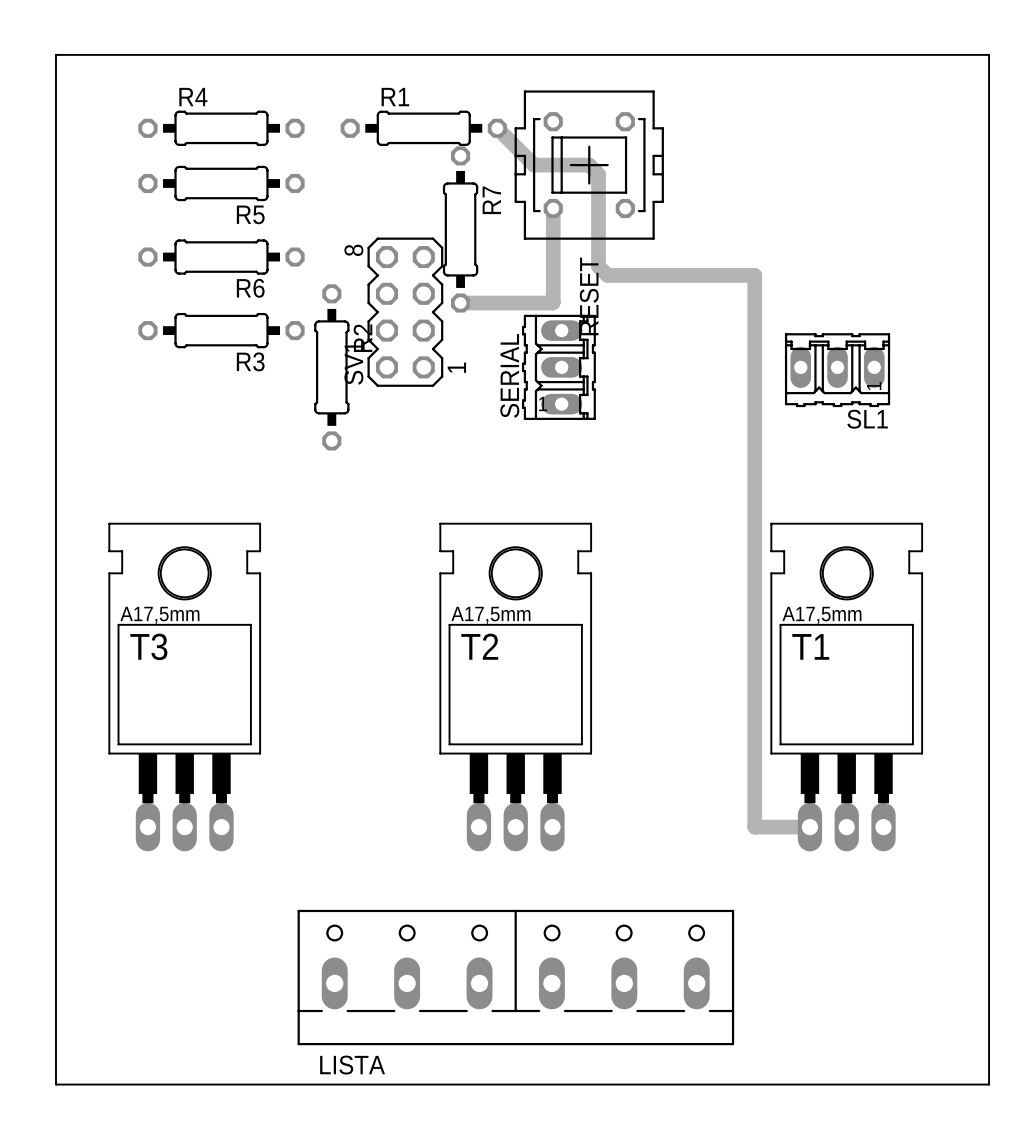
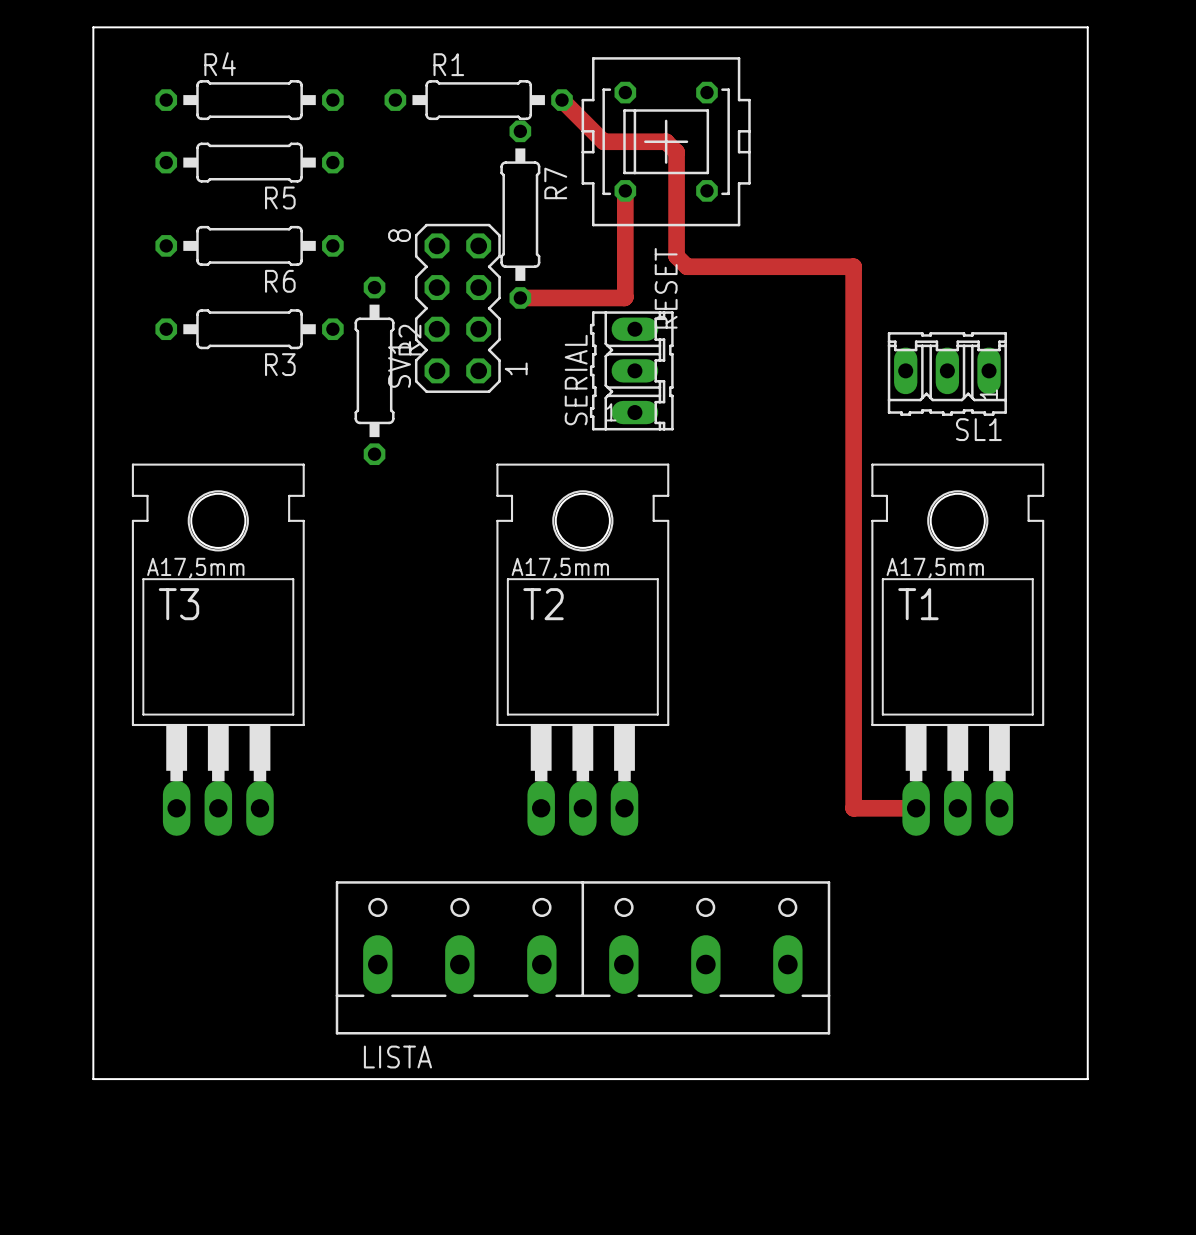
board edge: (55, 54) (989, 54) (989, 1084) (55, 1084) (55, 54) -> (93, 27) (93, 1079) (1087, 1079) (1087, 27) (93, 27)
T3 position: (184, 687) -> (218, 649)
T2 position: (515, 687) -> (582, 649)
T1 position: (846, 687) -> (957, 649)
track: (754, 753) (754, 827) (809, 827) -> (853, 808) (916, 808)
LISTA position: (515, 977) -> (583, 957)

